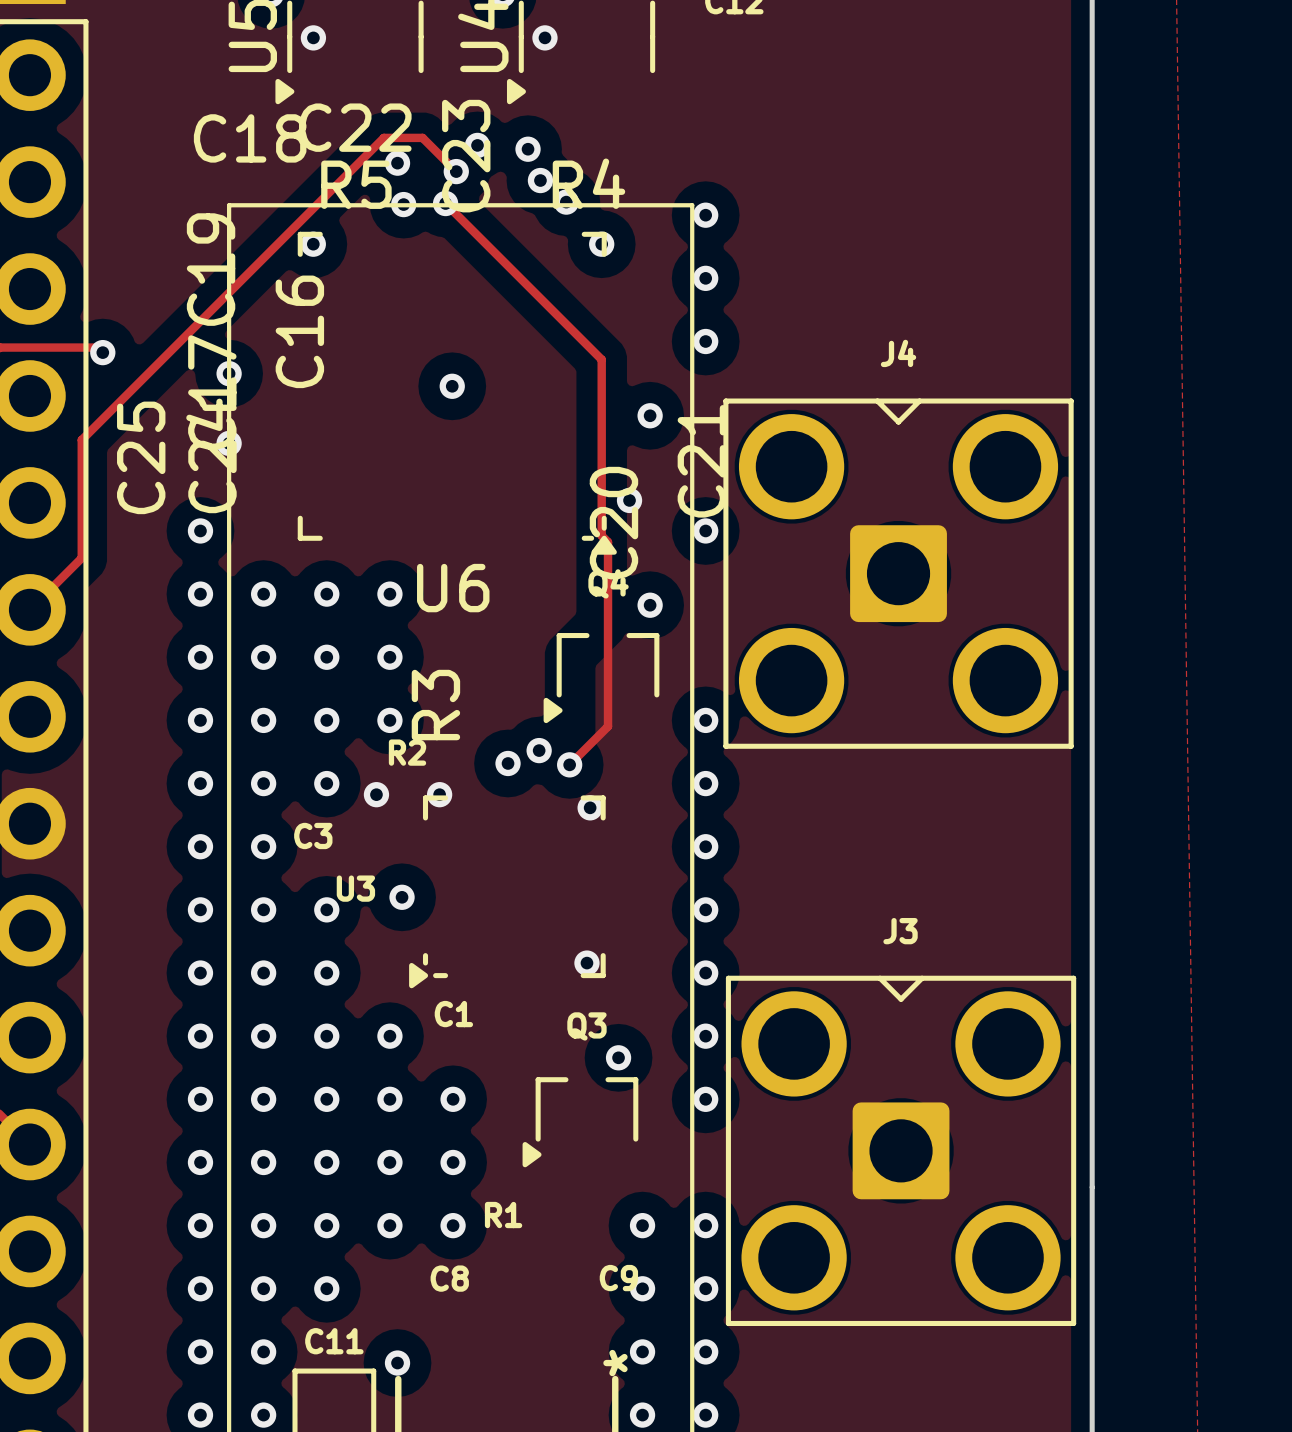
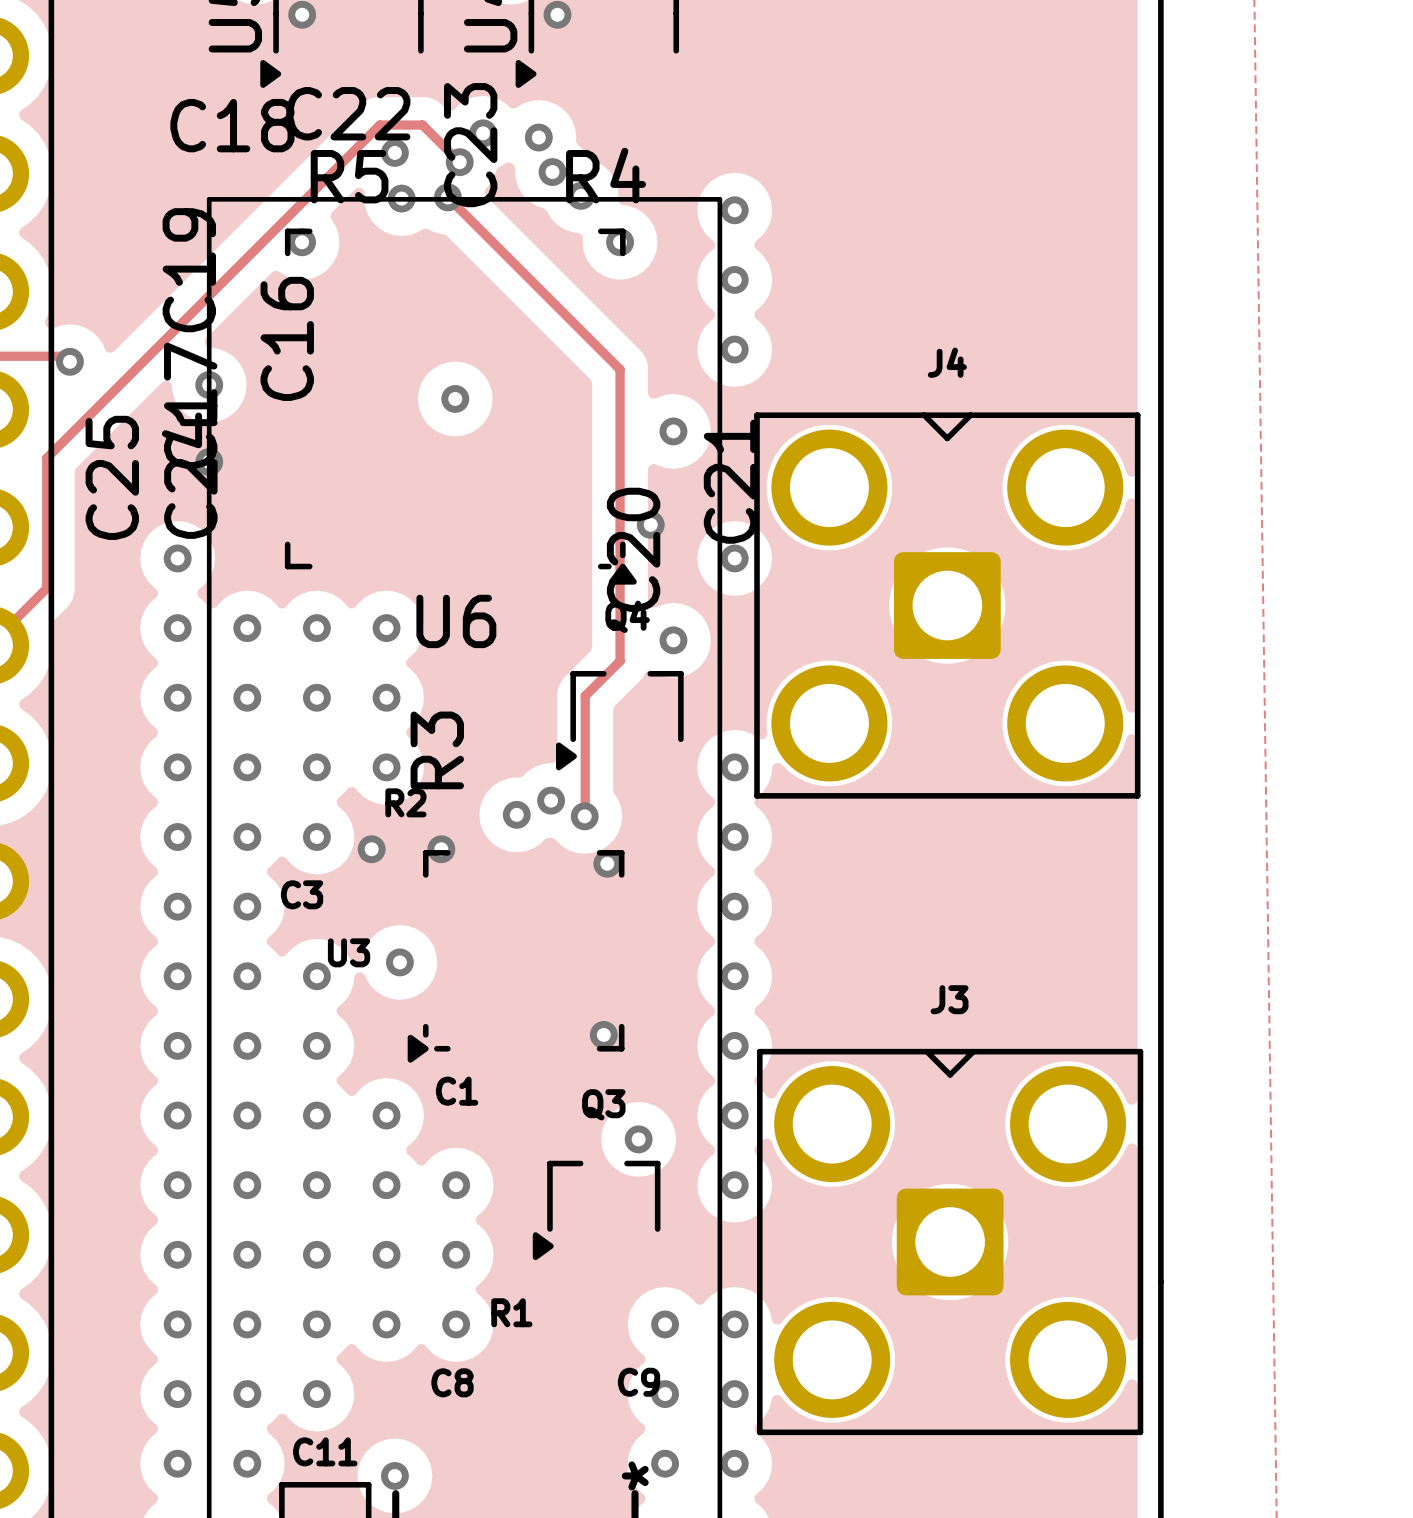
track: (601, 535) (608, 542) (608, 726) (570, 764) -> (620, 563) (620, 661) (585, 695) (585, 815)

